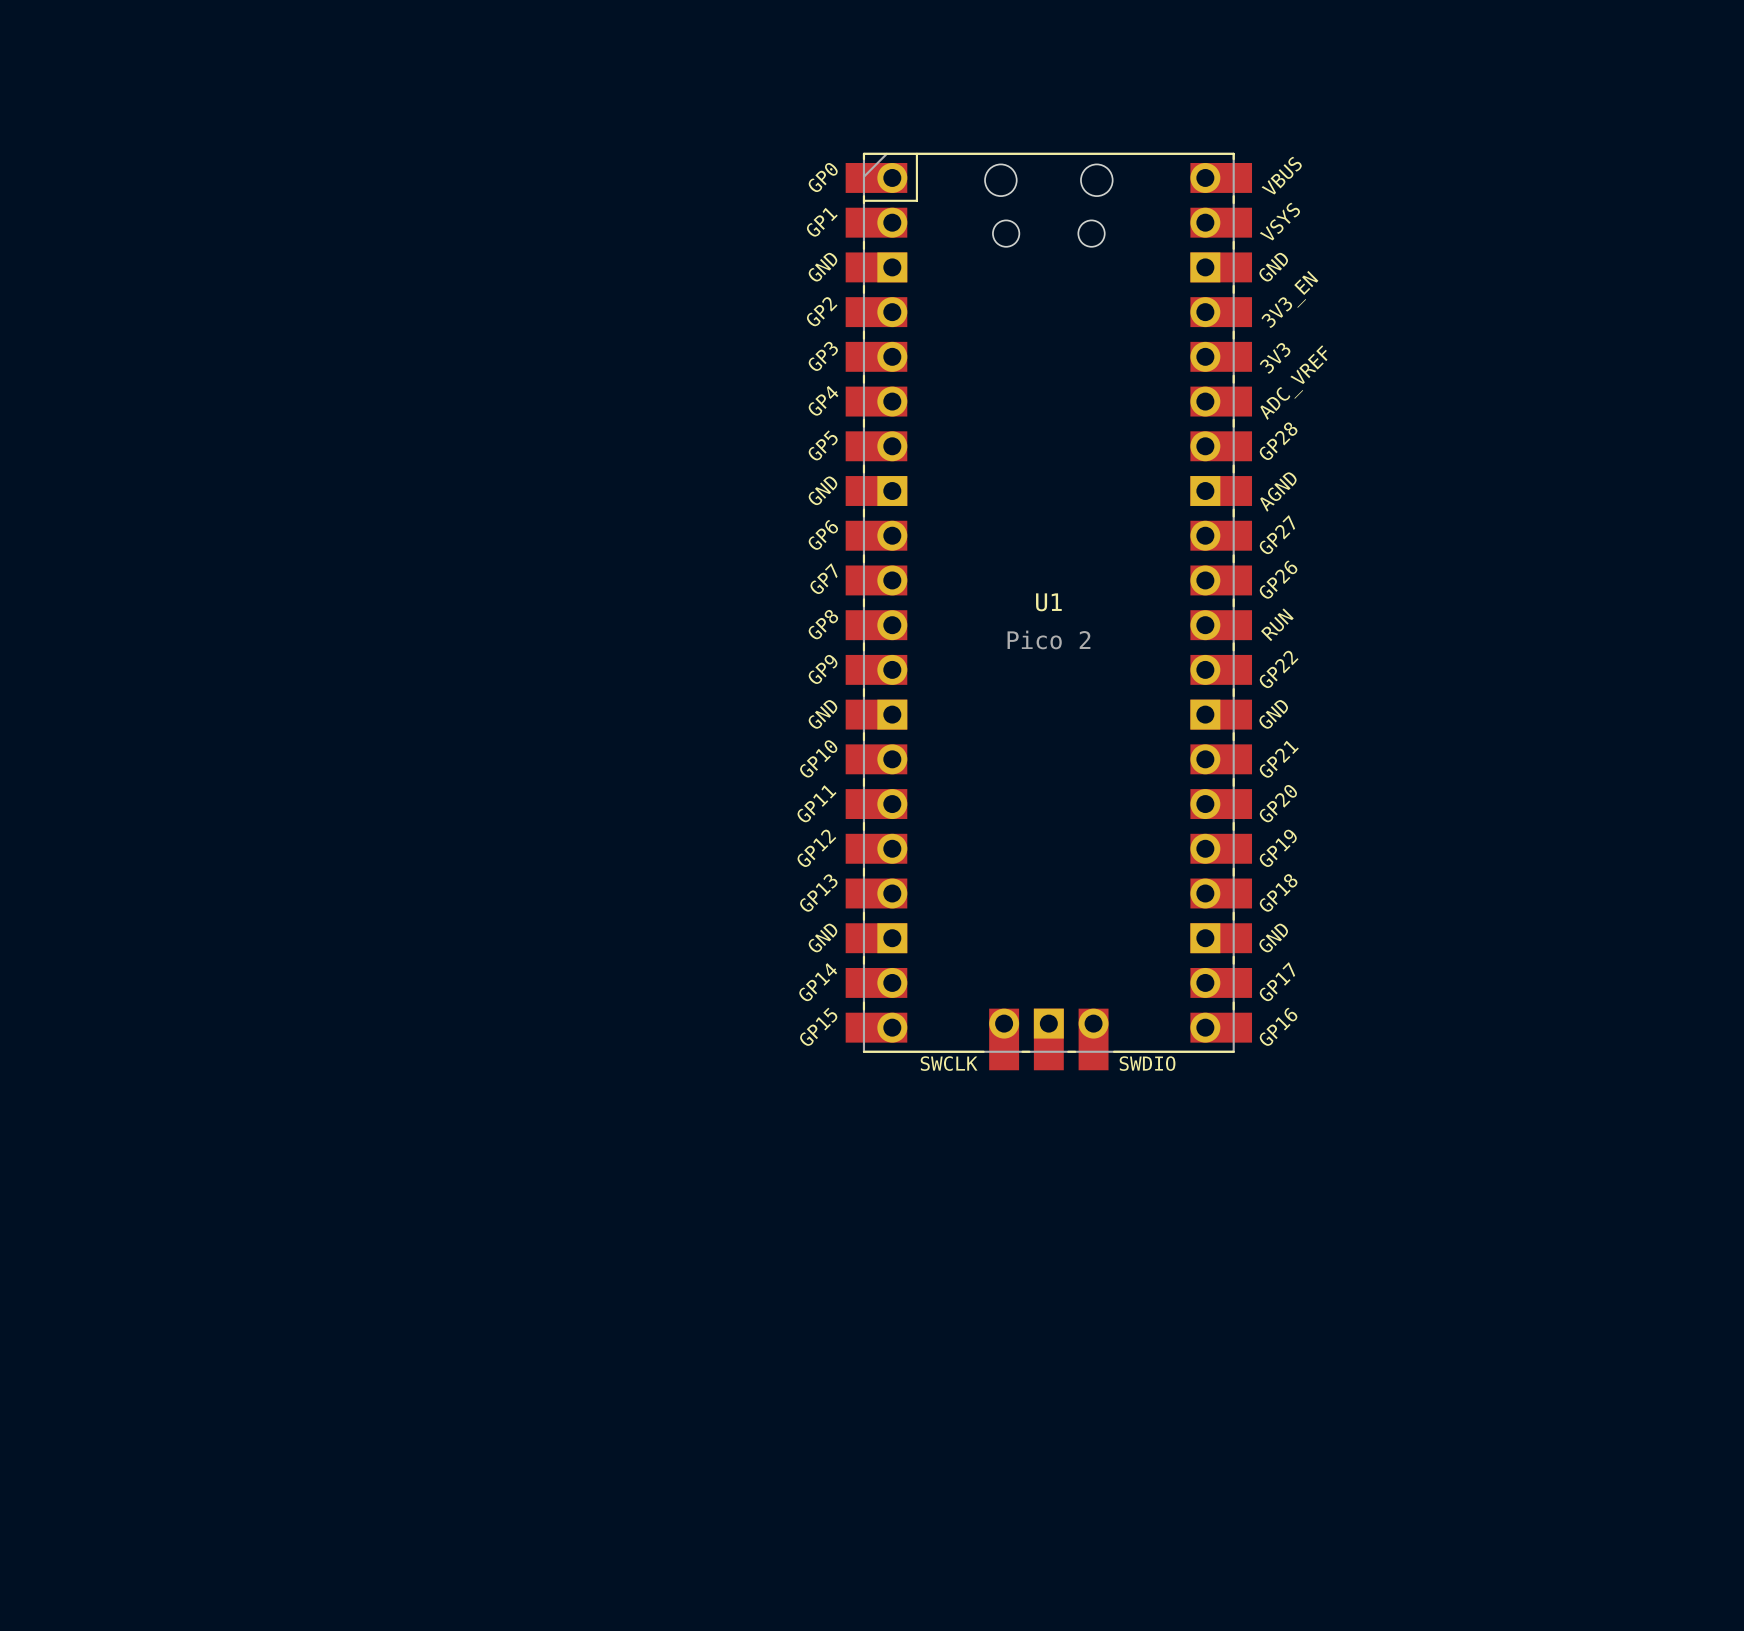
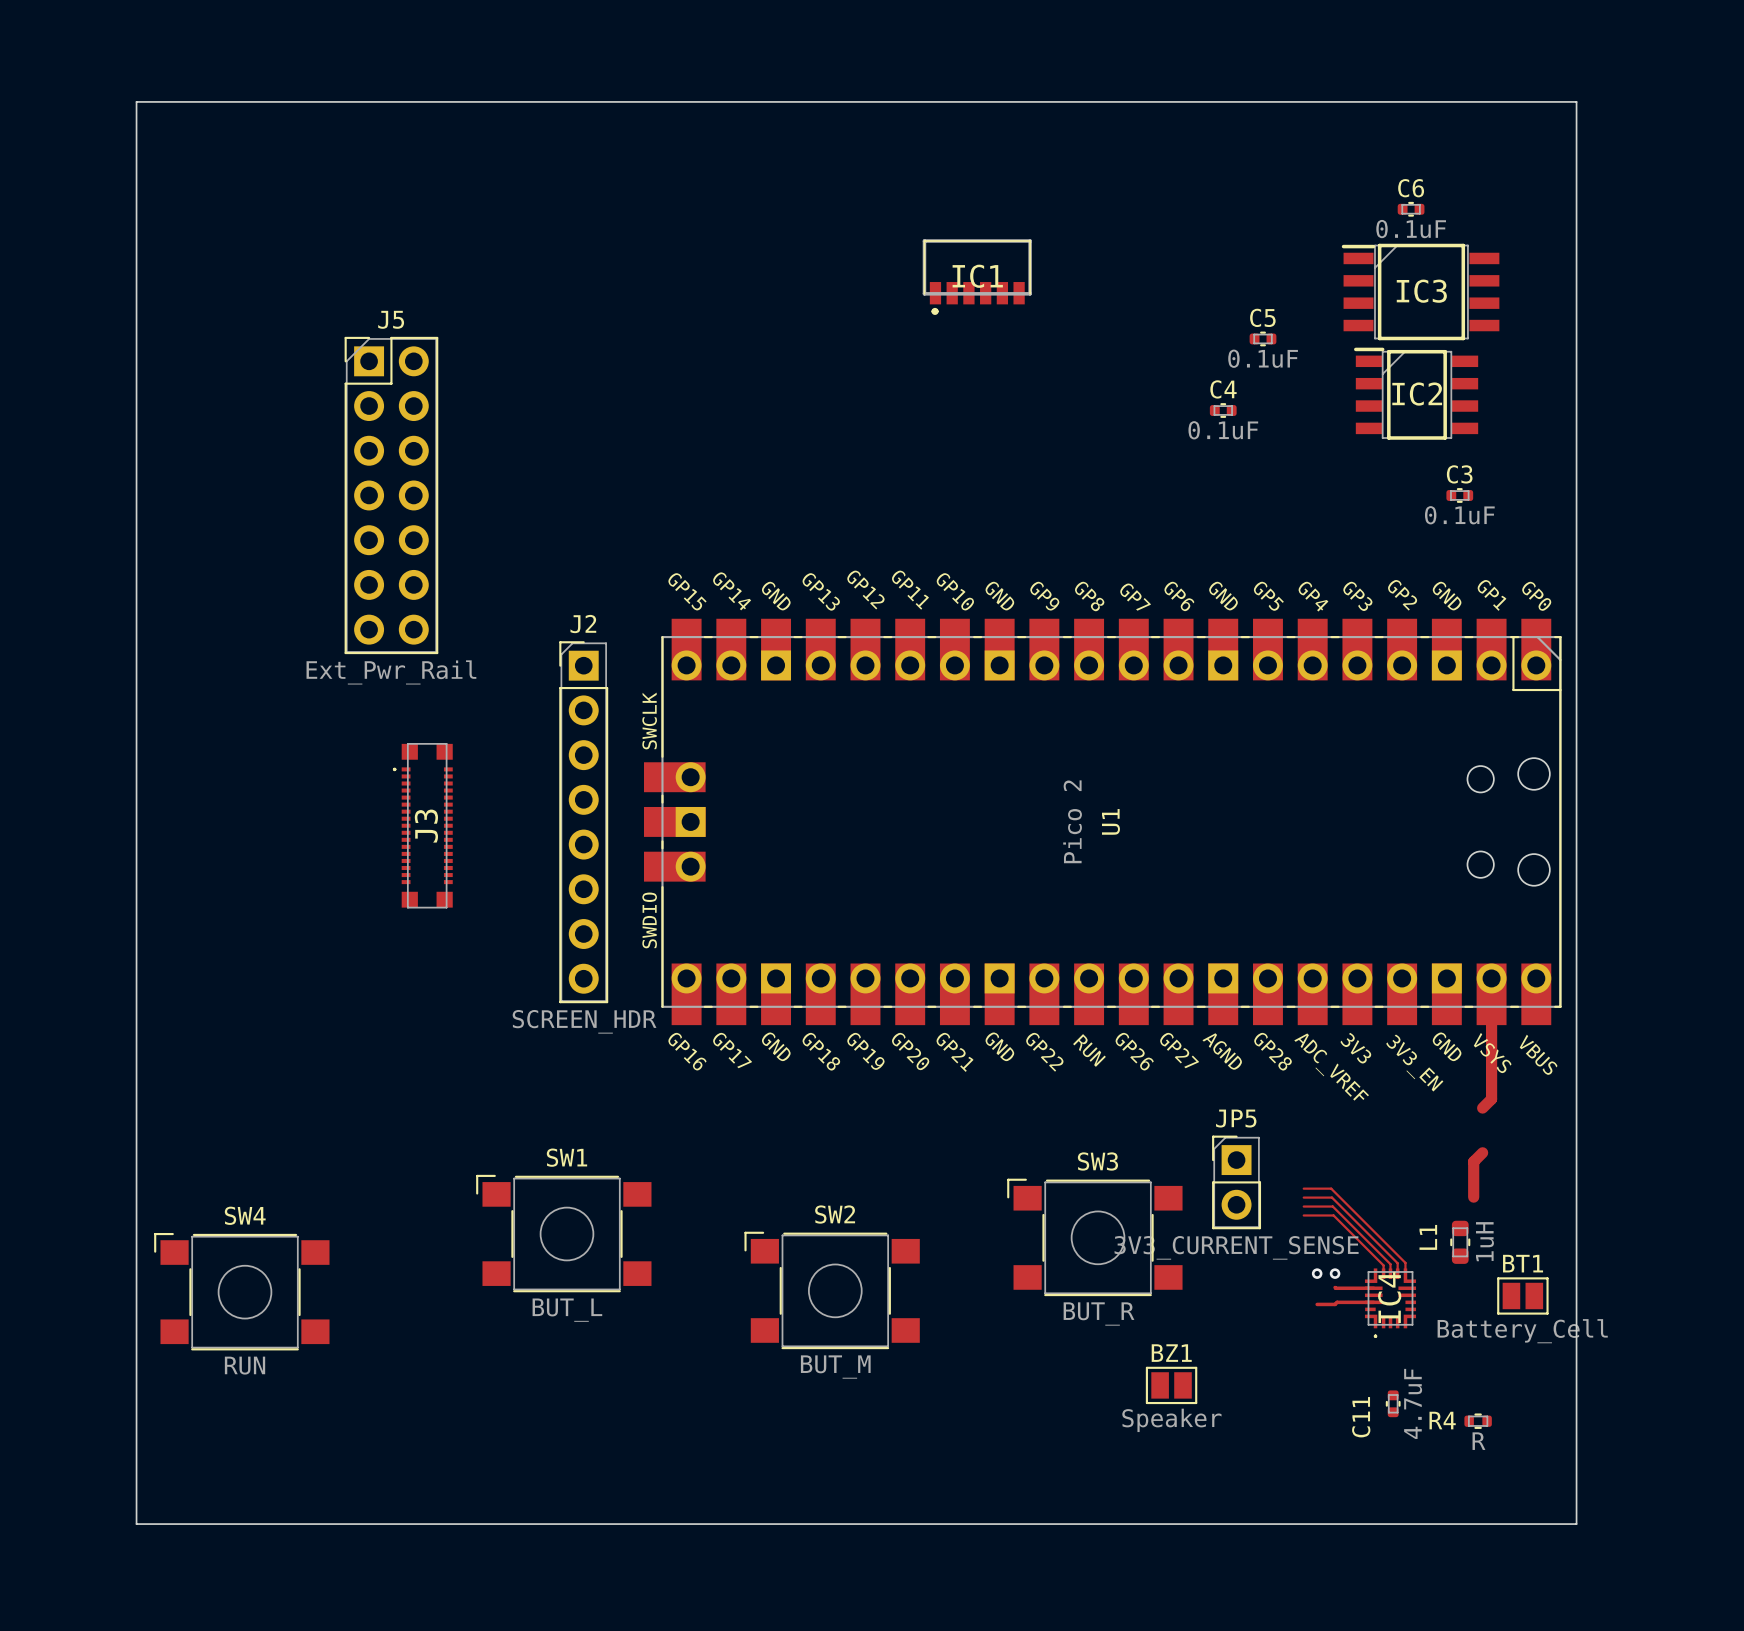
board edge: none -> (136, 101) (1576, 101) (1576, 1524) (136, 1524) (136, 101)
C6: none -> 0.1uF (1411, 209)
IC1: none -> (977, 277)
IC3: none -> (1420, 292)
C5: none -> 0.1uF (1263, 338)
IC2: none -> (1416, 393)
C4: none -> 0.1uF (1223, 410)
J5: none -> Ext_Pwr_Rail (391, 495)
C3: none -> 0.1uF (1459, 495)
U1 rotation: 0° (1048, 611) -> 90° clockwise (1102, 821)
J2: none -> SCREEN_HDR (583, 822)
J3: none -> (422, 825)
top track: none -> (1491, 978) (1491, 1099) (1482, 1108)
top track: none -> (1482, 1152) (1473, 1161) (1473, 1197)
JP5: none -> 3V3_CURRENT_SENSE (1236, 1182)
top track: none -> (1303, 1188) (1331, 1188) (1405, 1262) (1405, 1275)
top track: none -> (1303, 1197) (1332, 1197) (1397, 1263) (1397, 1273)
top track: none -> (1303, 1206) (1332, 1206) (1390, 1264) (1390, 1273)
top track: none -> (1303, 1215) (1333, 1215) (1383, 1265) (1383, 1273)
SW1: none -> BUT_L (563, 1233)
SW3: none -> BUT_R (1094, 1237)
L1: none -> 1uH (1460, 1242)
via: none -> (1317, 1273)
via: none -> (1335, 1273)
top track: none -> (1335, 1287) (1373, 1288)
SW2: none -> BUT_M (832, 1290)
SW4: none -> RUN (241, 1291)
BT1: none -> Battery_Cell (1522, 1295)
top track: none -> (1373, 1302) (1317, 1304)
IC4: none -> (1390, 1303)
BZ1: none -> Speaker (1171, 1385)
C11: none -> 4.7uF (1393, 1403)
R4: none -> R (1478, 1421)

